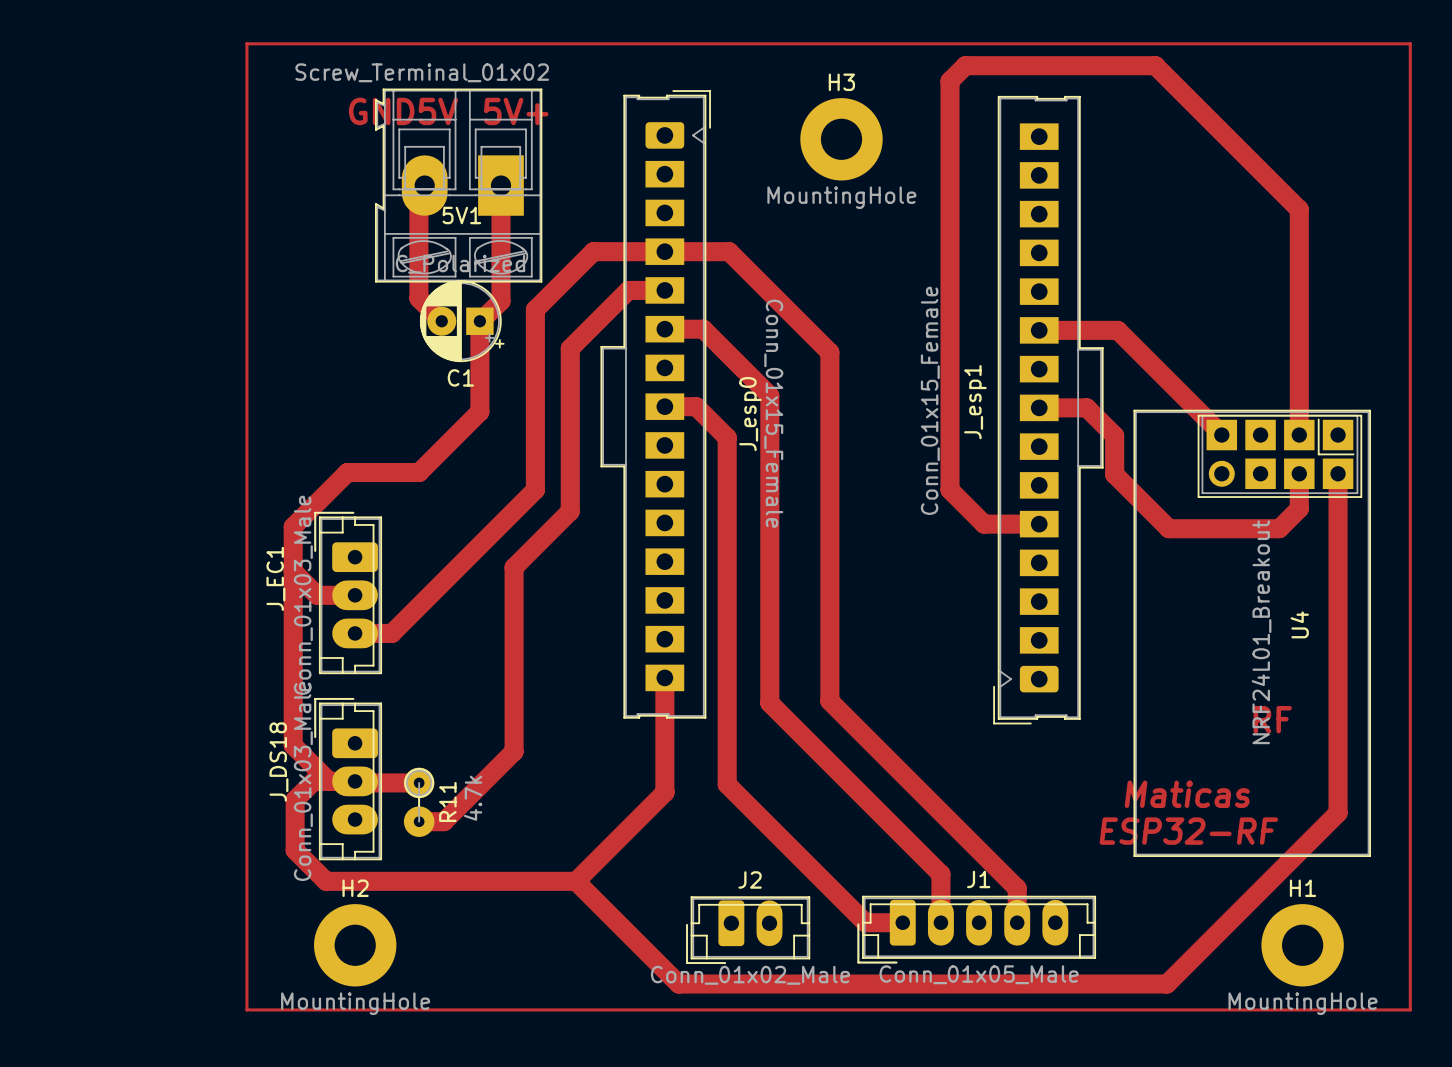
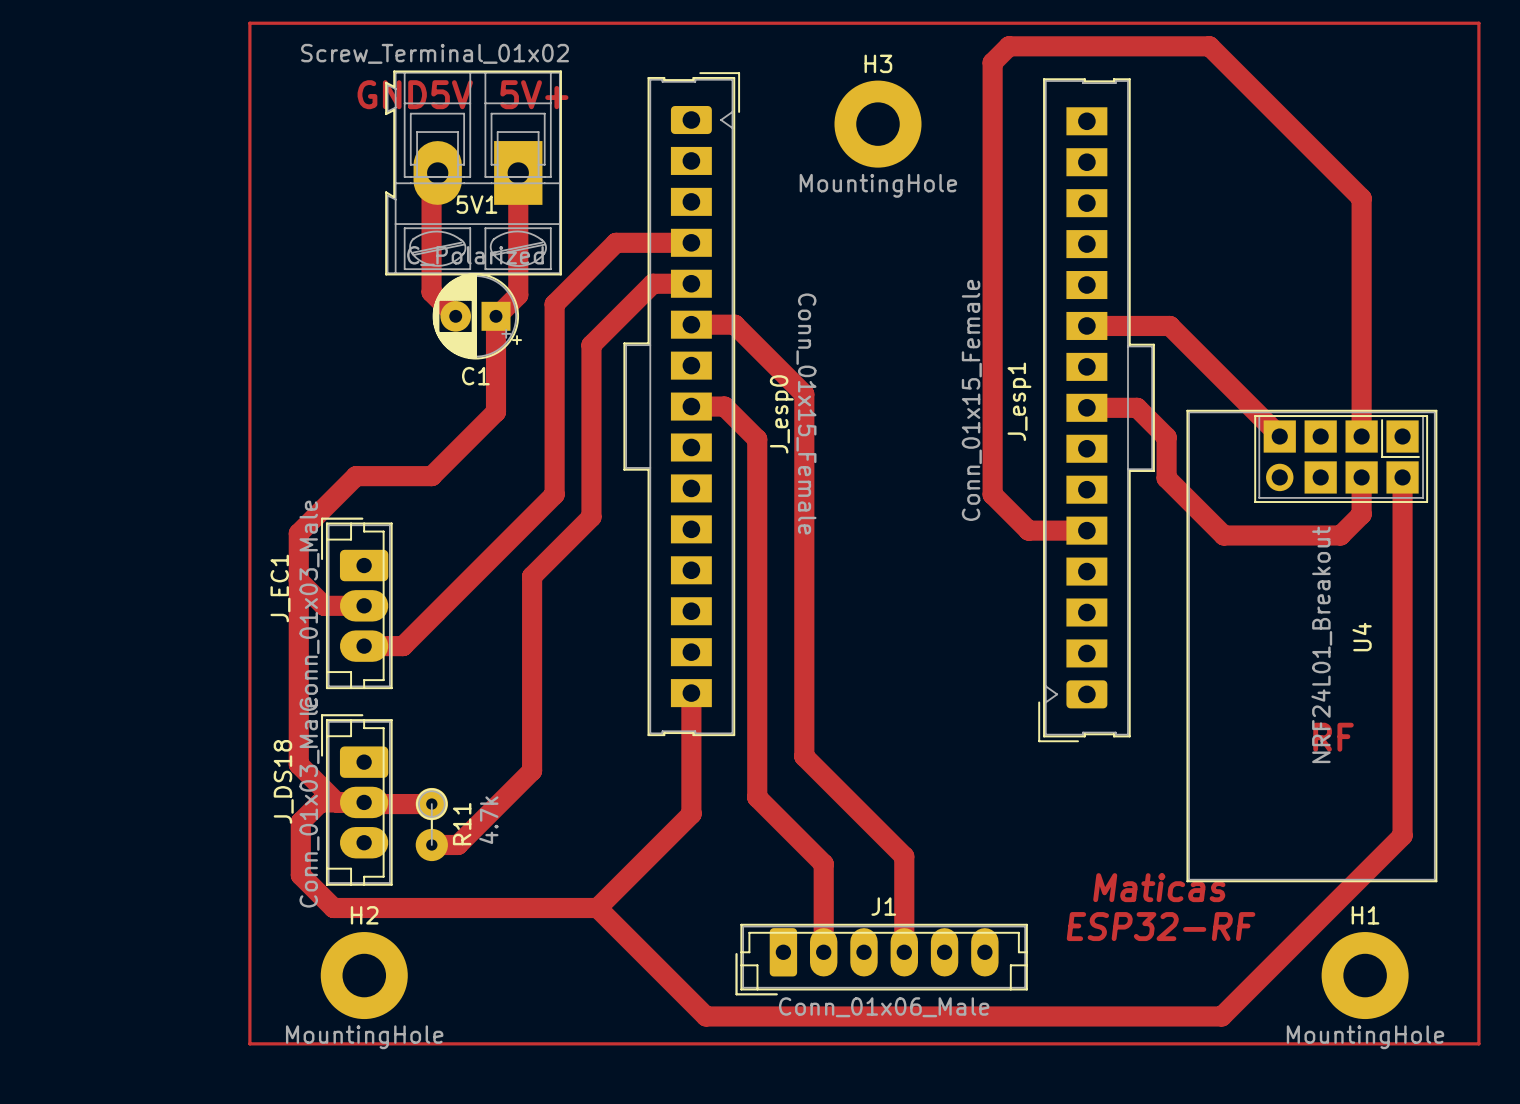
track: (664, 251) (729, 251) (829, 352) (829, 701) (1017, 888) (1017, 922) -> none
track: (703, 329) (769, 395) (769, 703) (940, 874) (940, 922) -> (732, 324) (734, 324) (804, 394) (804, 756) (904, 856) (904, 952)
track: (727, 776) (727, 784) (865, 922) (902, 922) -> (757, 797) (823, 863) (823, 952)
text position: Maticas (1187, 794) -> Maticas (1159, 887)
text position: ESP32-RF (1188, 831) -> ESP32-RF (1161, 926)
J1 footprint: [857, 895, 1097, 964] -> [735, 923, 1028, 996]
J2: Conn_01x02_Male (748, 930) -> none
J1 value: Conn_01x05_Male (979, 974) -> Conn_01x06_Male (884, 1007)

